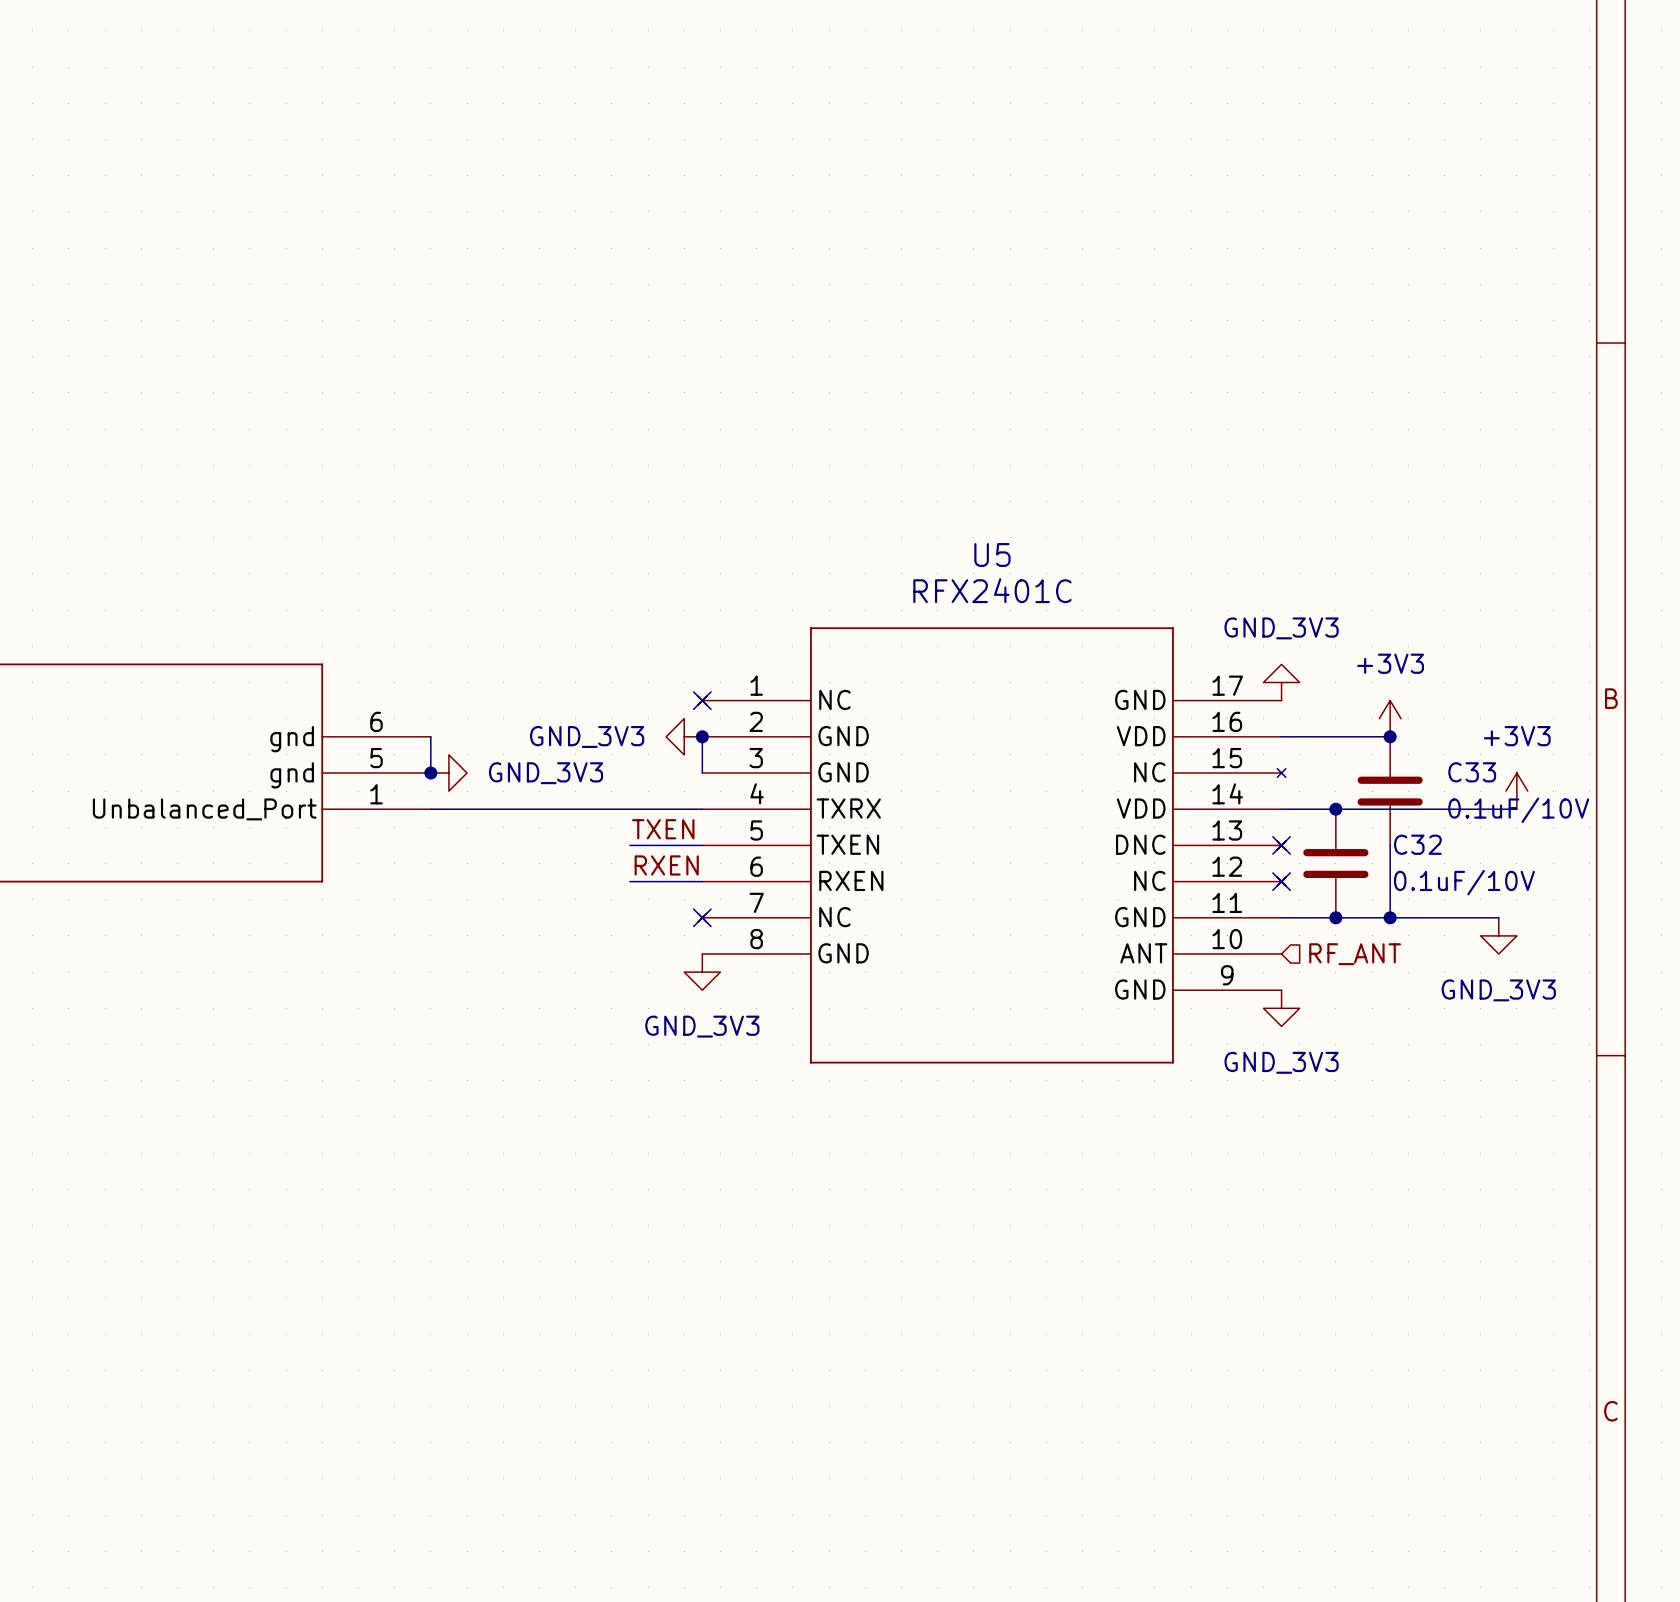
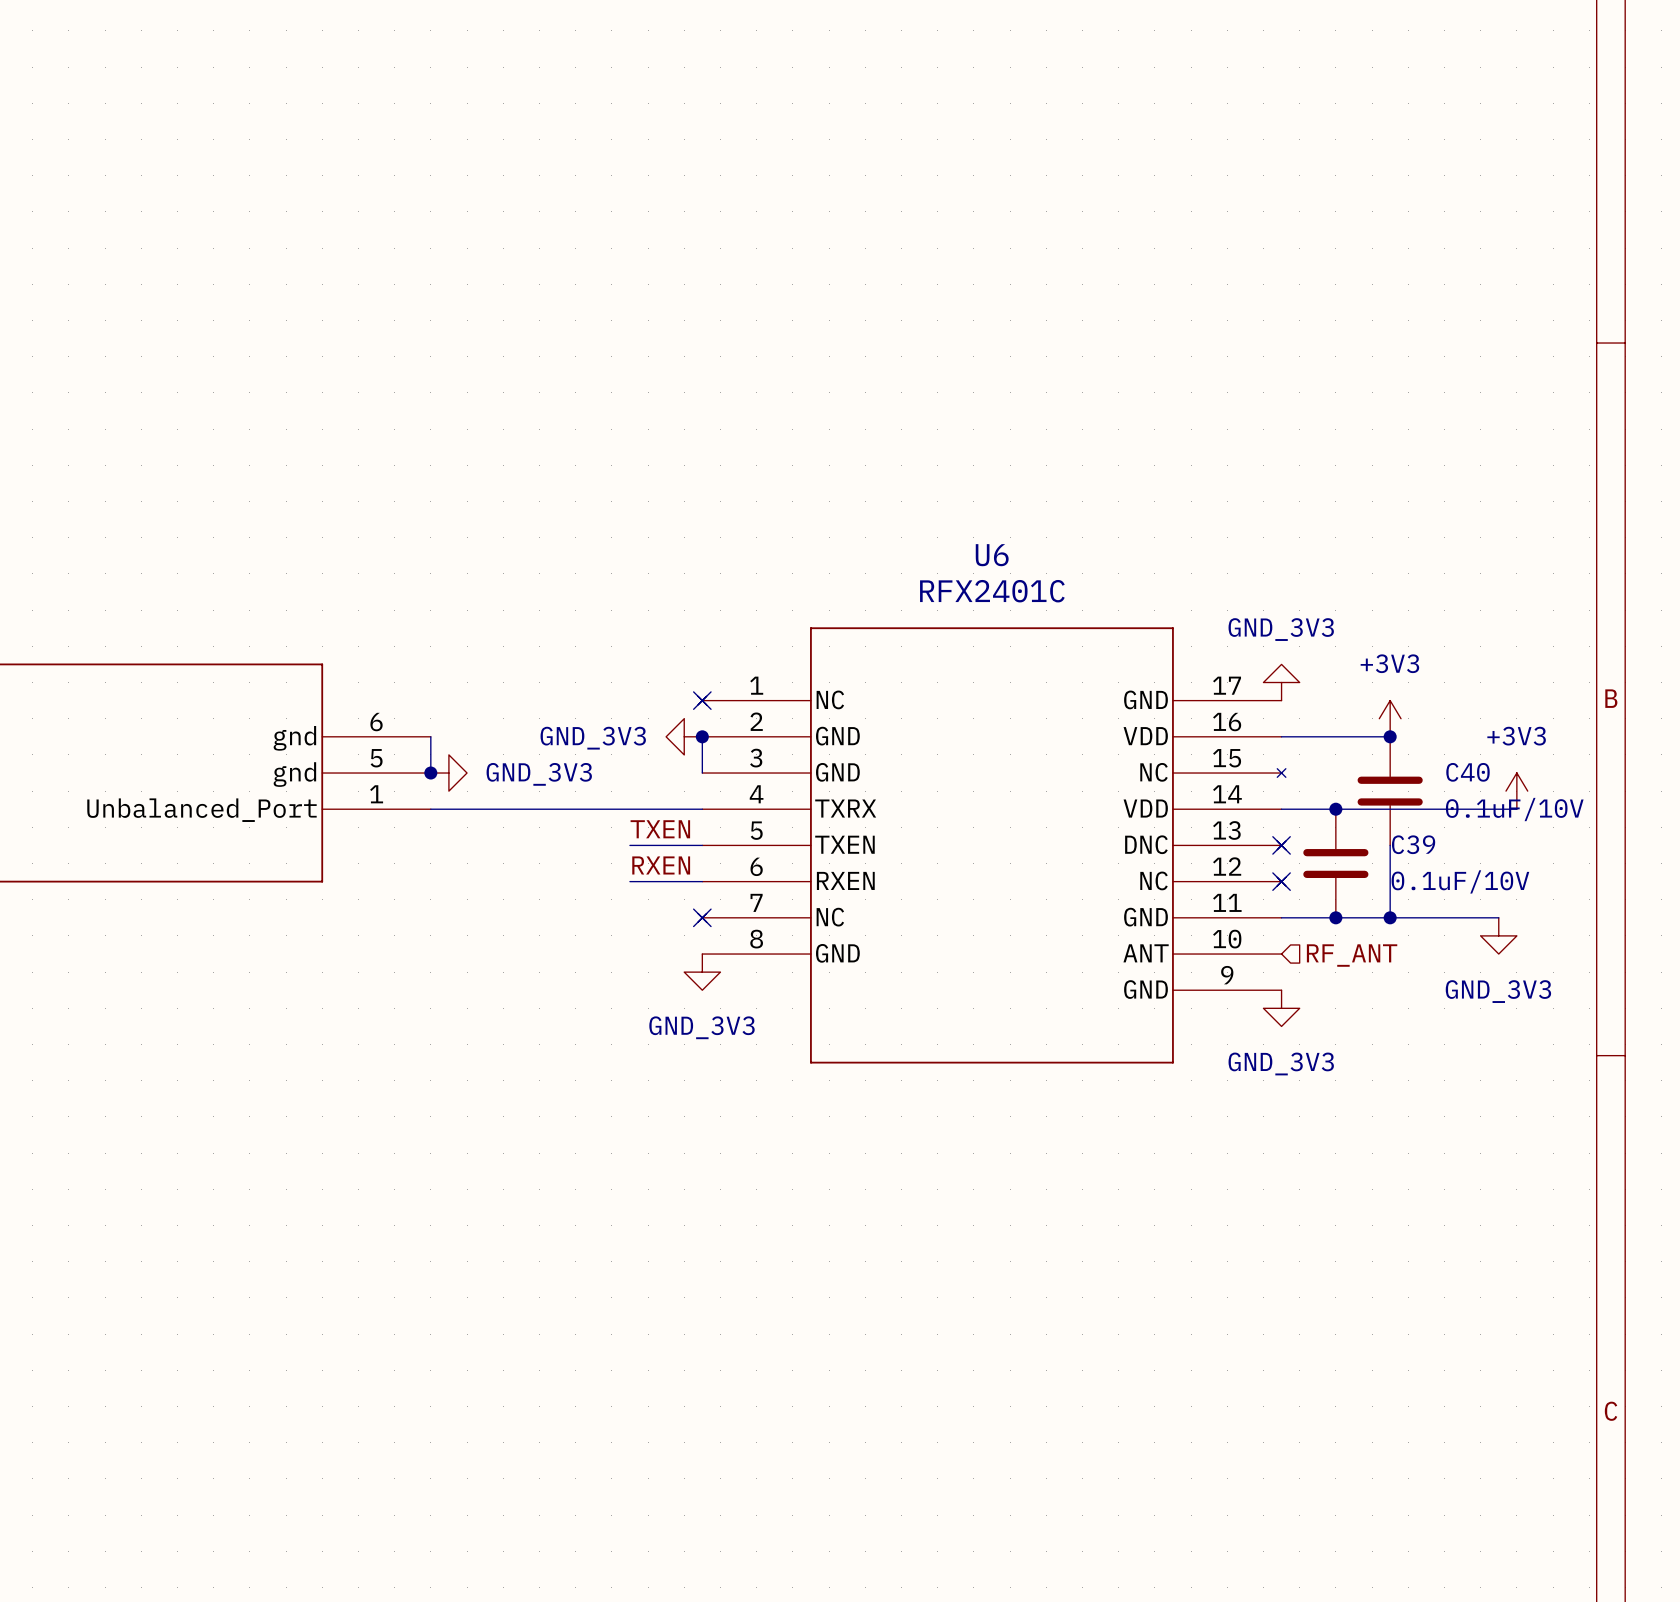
U5 name: U5 (992, 554) -> U6 (992, 555)
C33 name: C33 (1472, 772) -> C40 (1467, 772)
C32 name: C32 (1417, 844) -> C39 (1413, 844)

